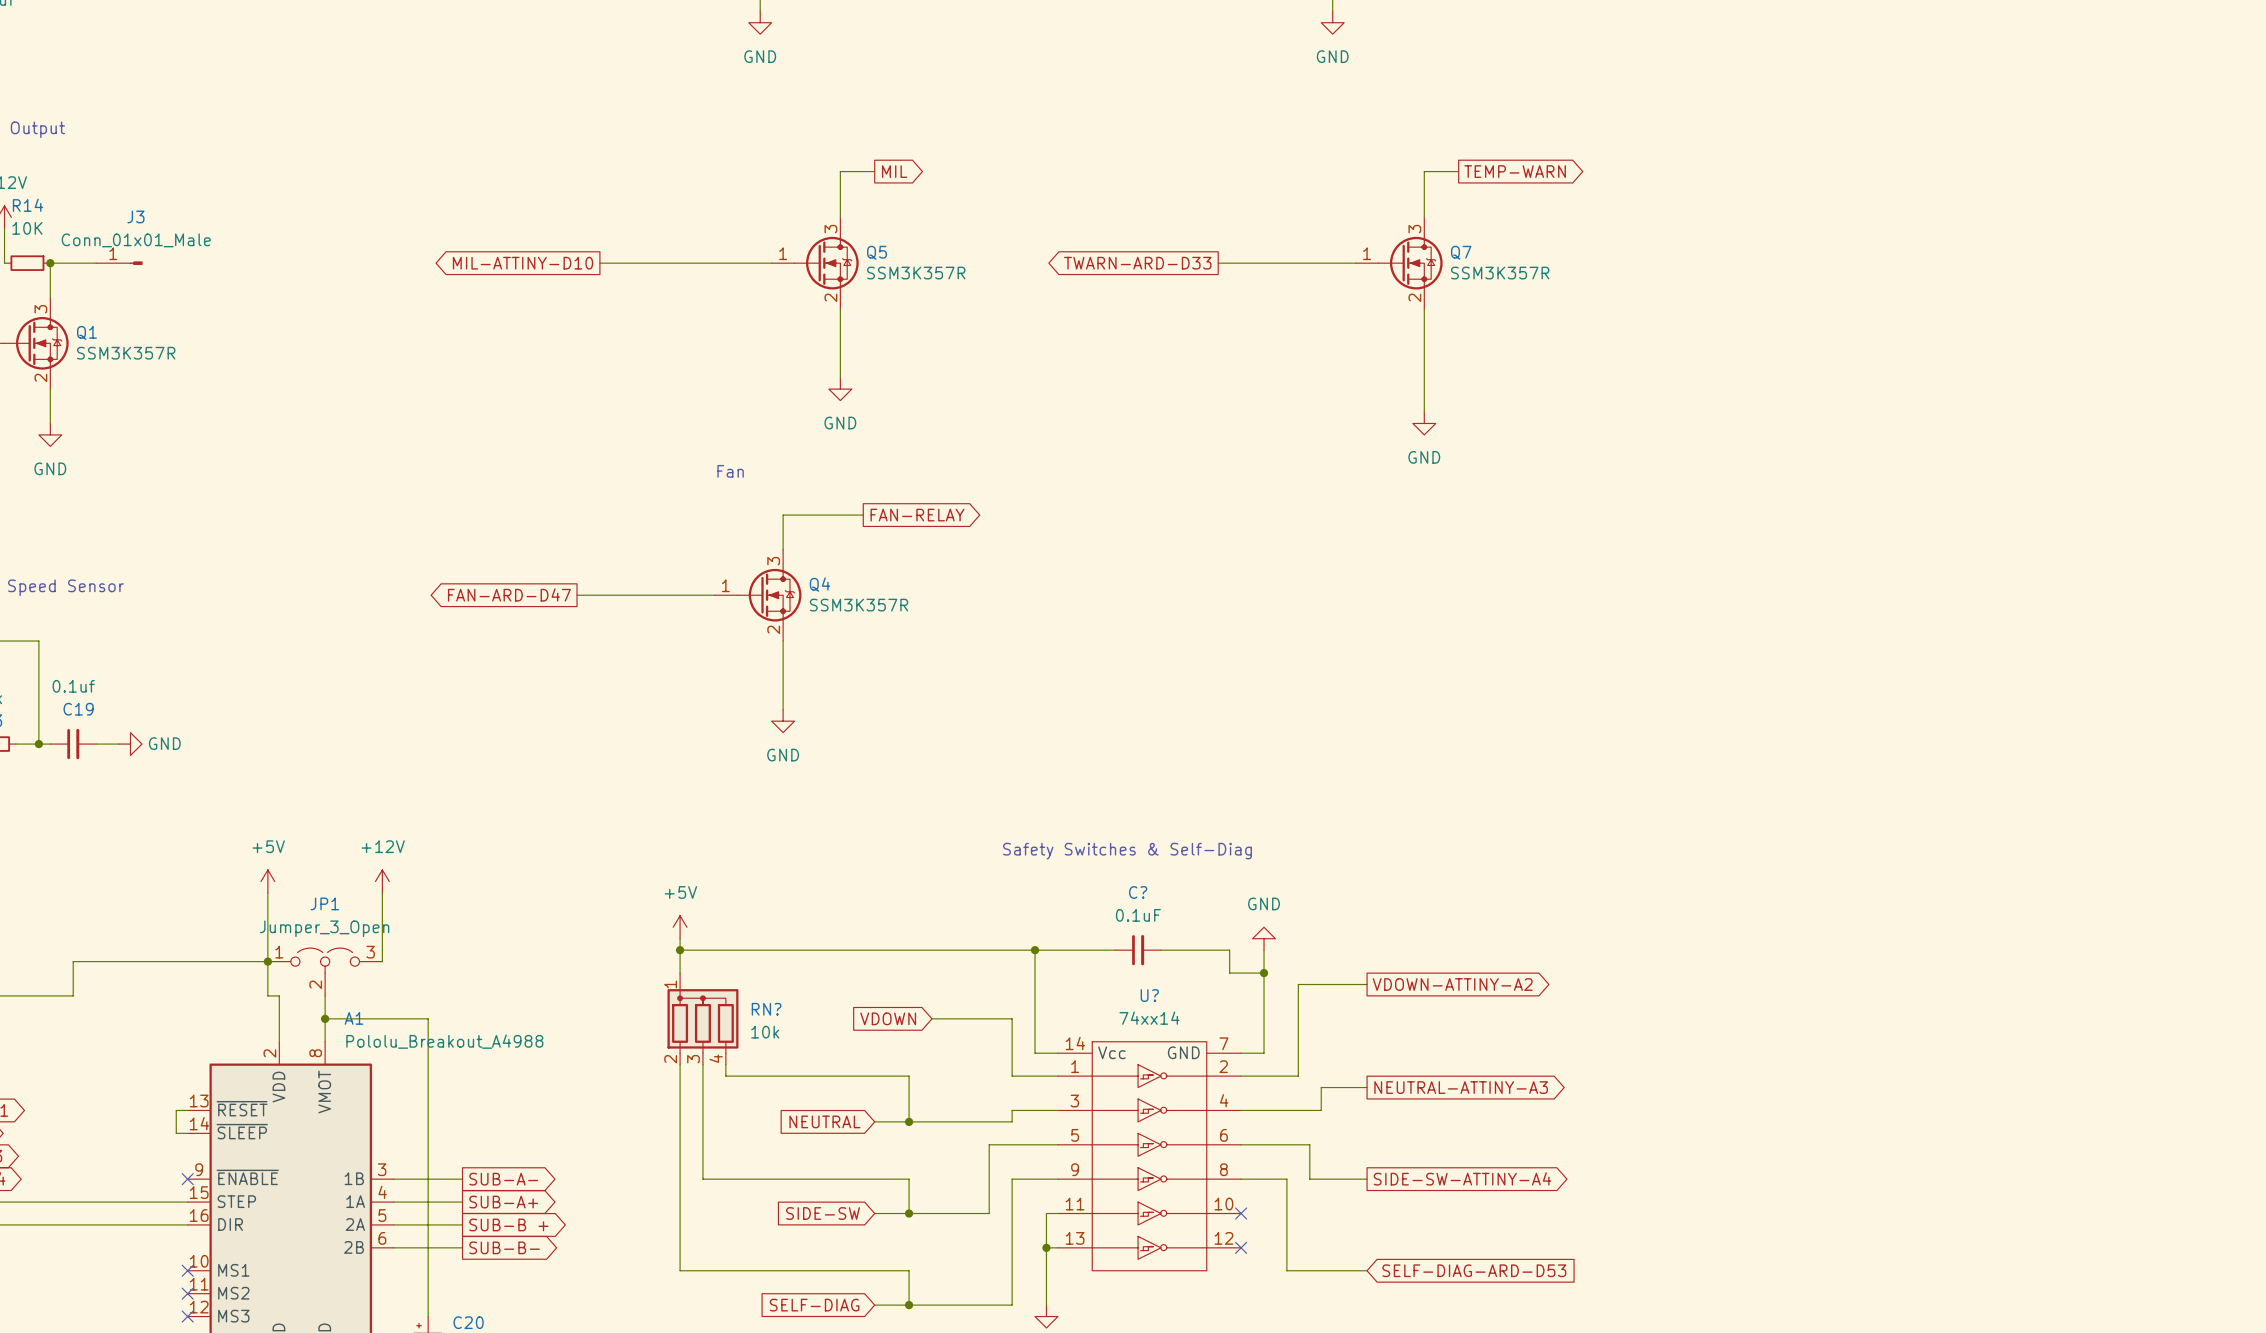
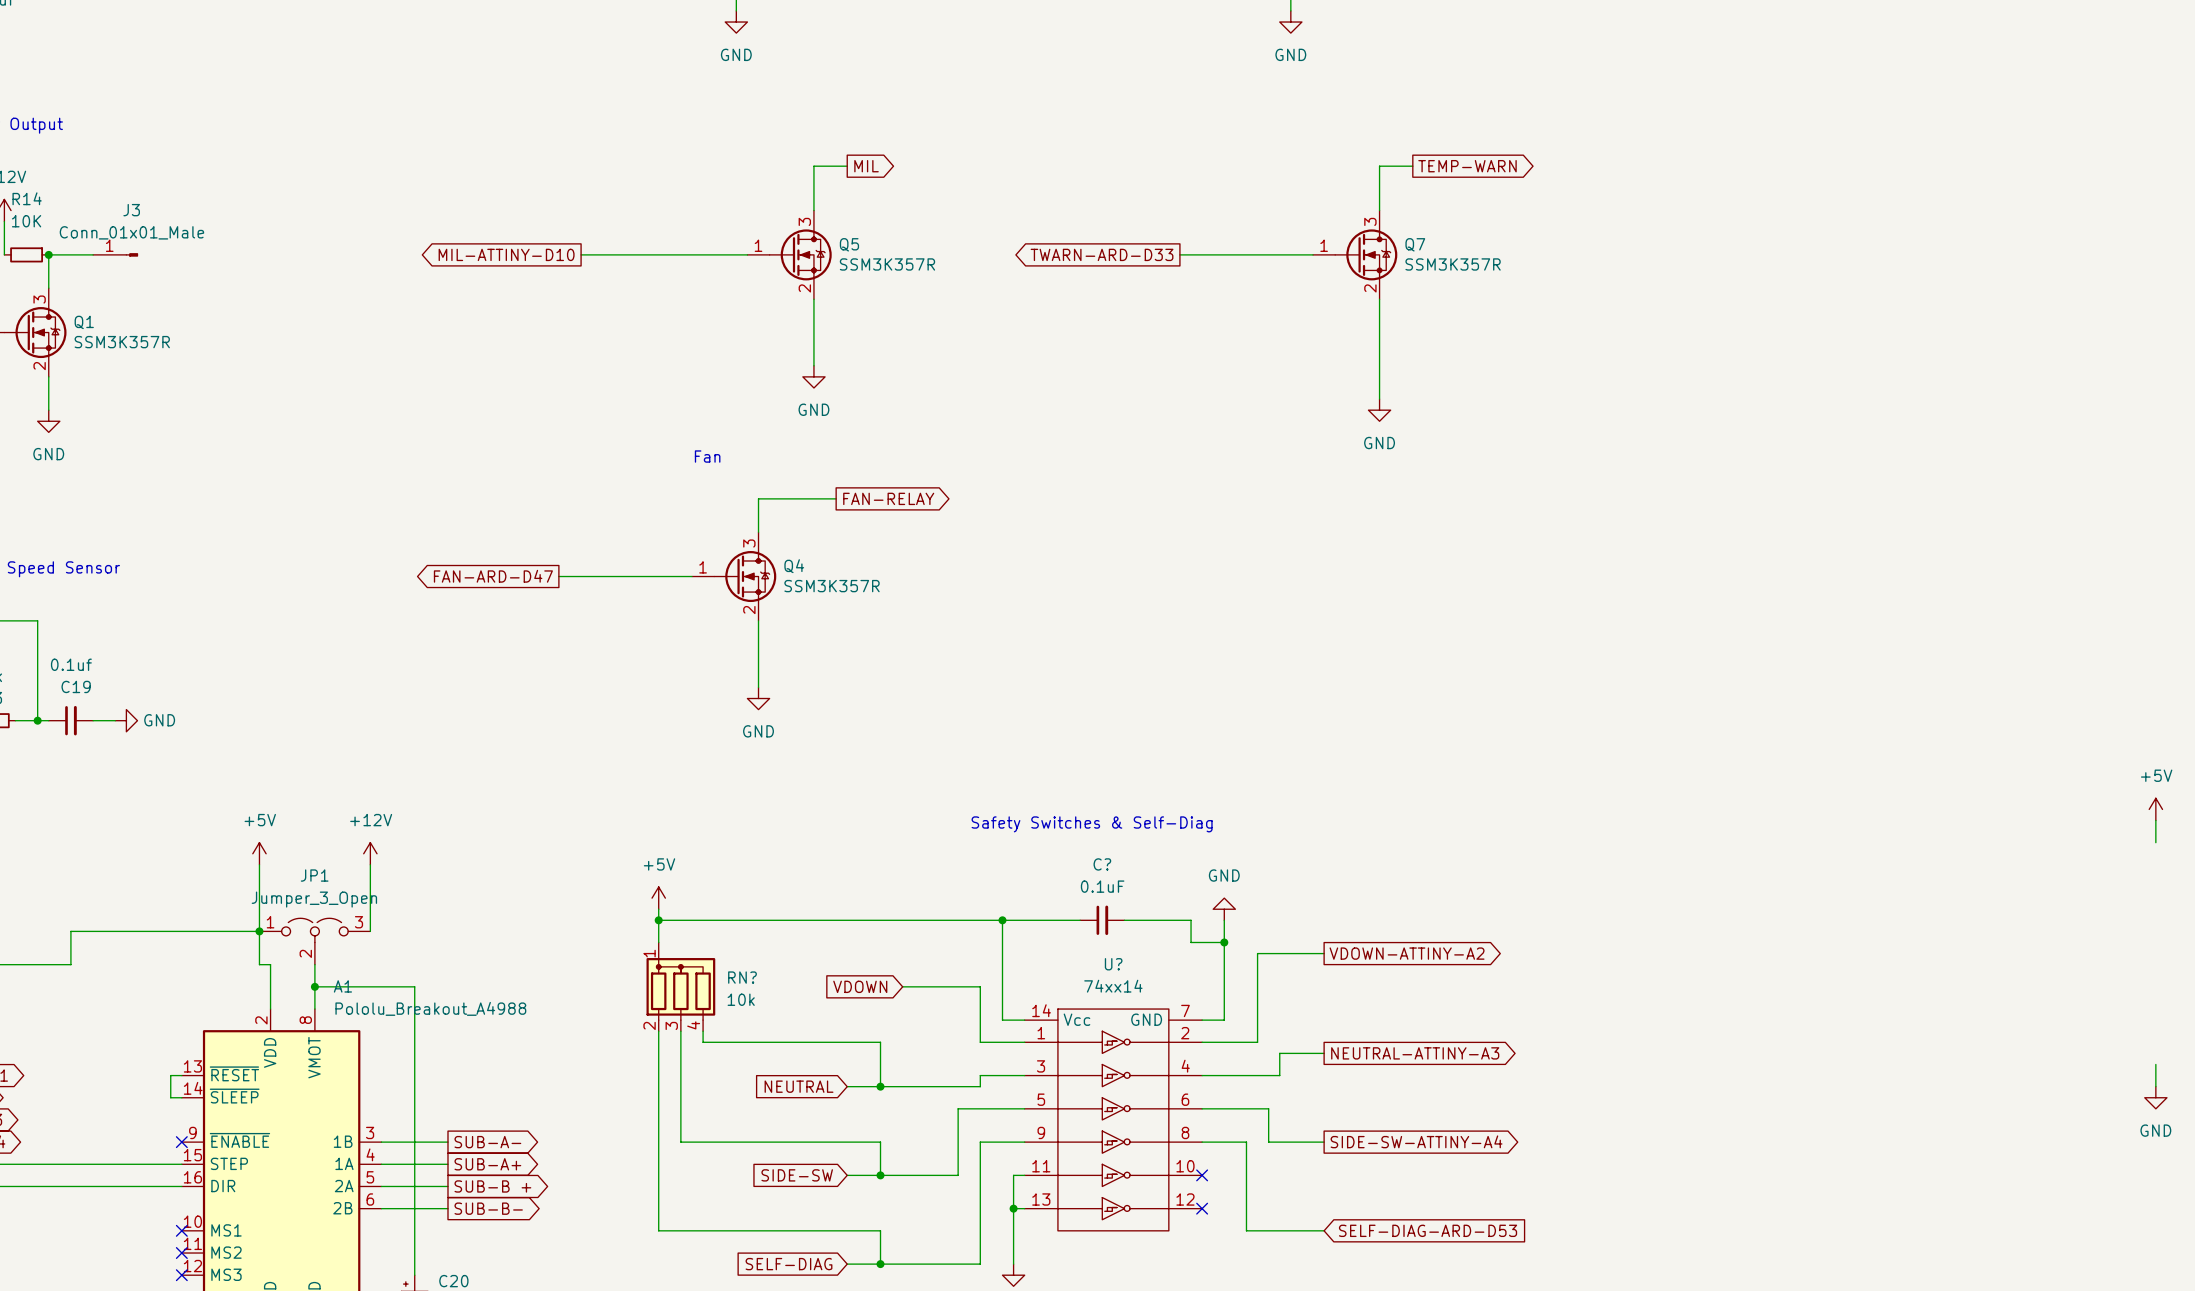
power symbol: none -> +5V (2155, 809)
wire: none -> (2155, 820) (2155, 842)
wire: none -> (2155, 1064) (2155, 1086)
power symbol: none -> GND (2155, 1097)

